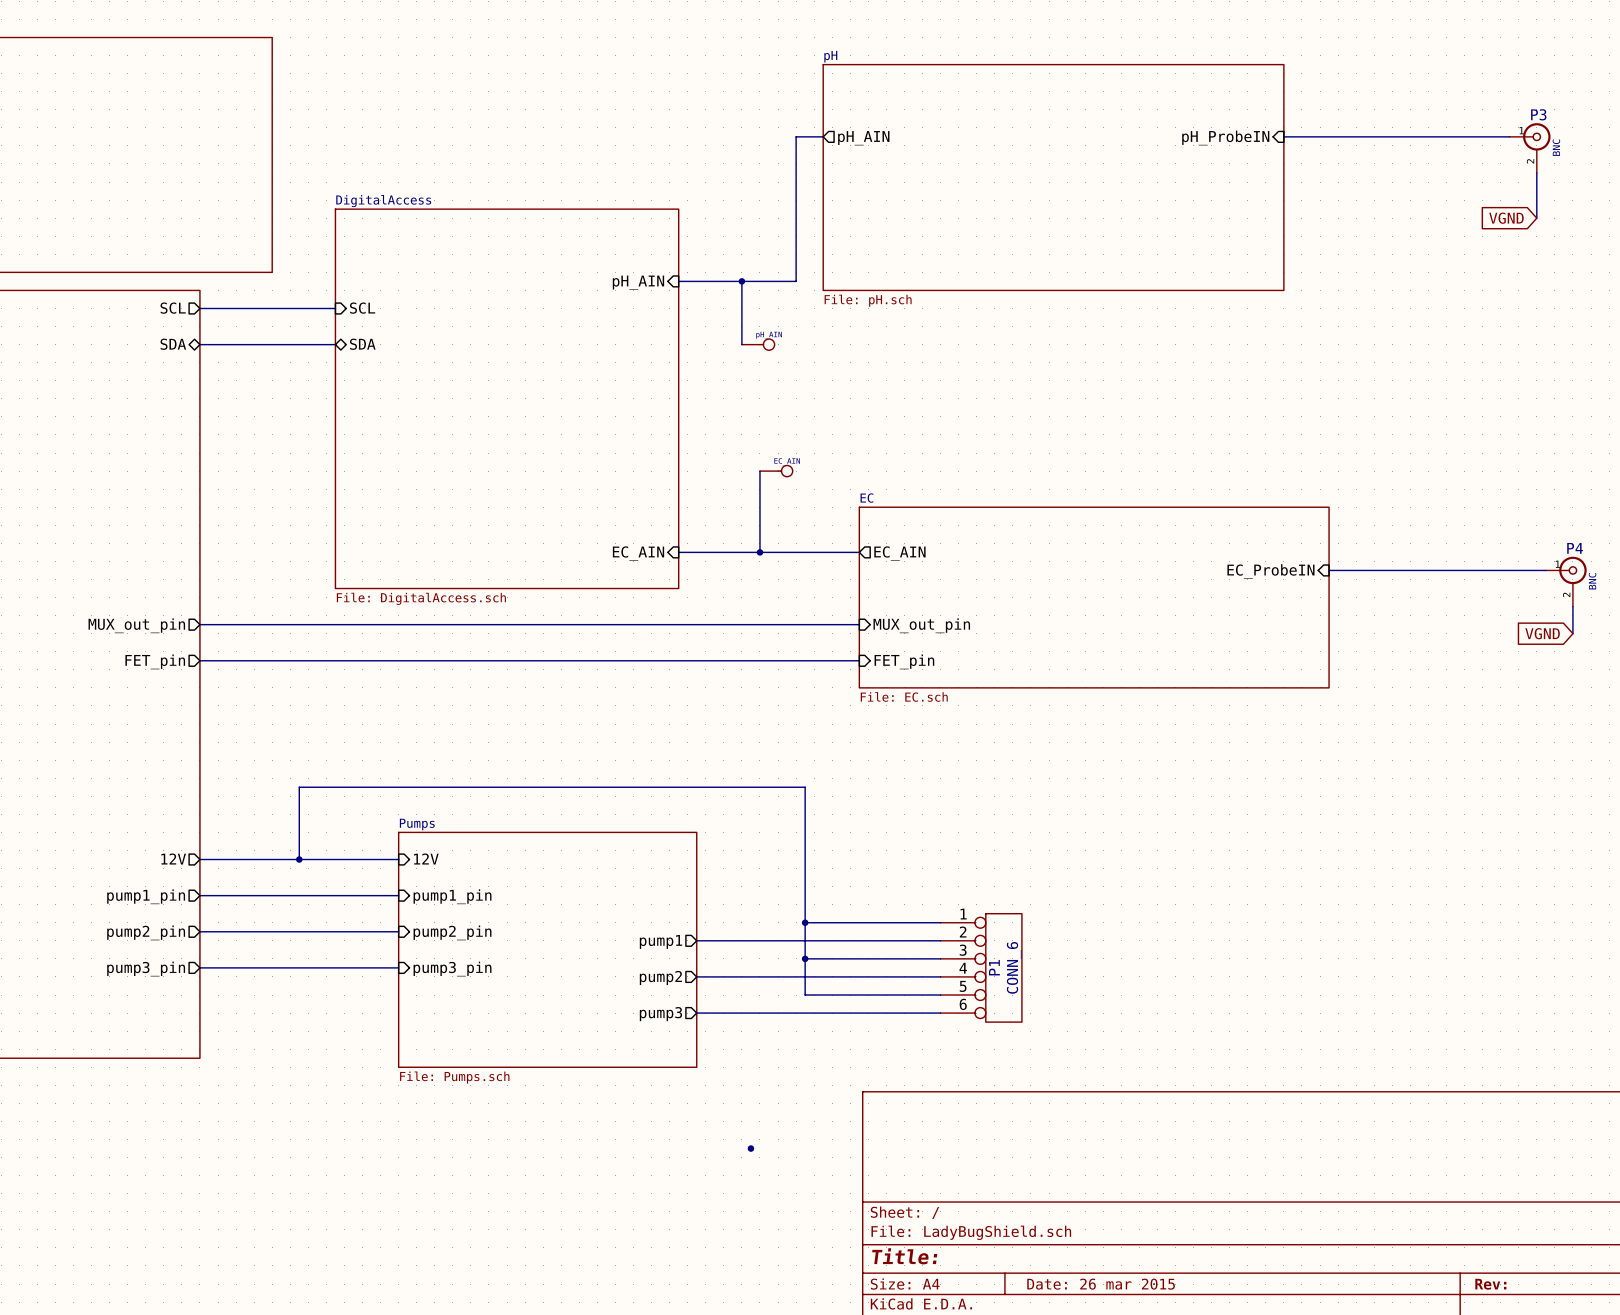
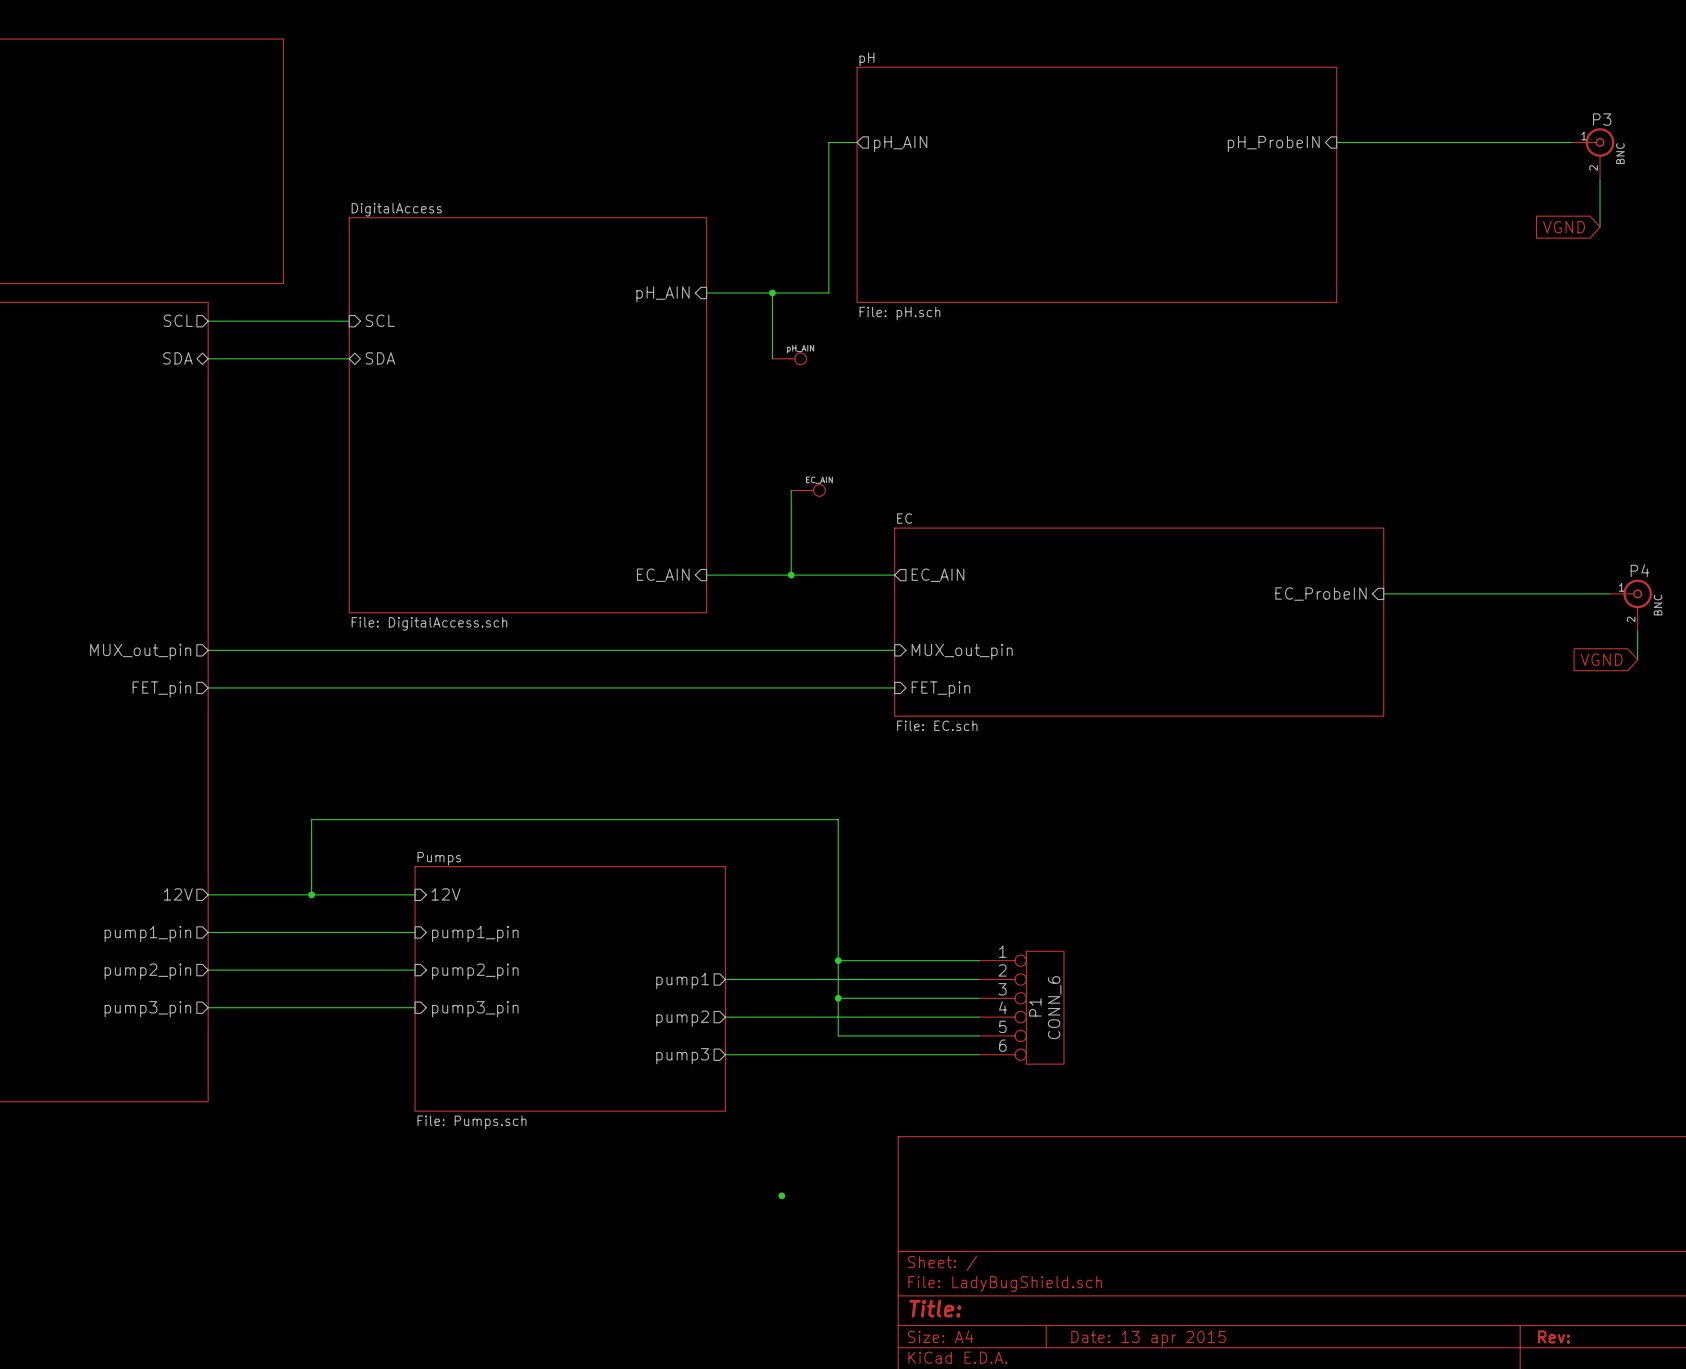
title block: Date: 26 mar 2015 (1101, 1284) -> Date: 13 apr 2015 (1148, 1338)

